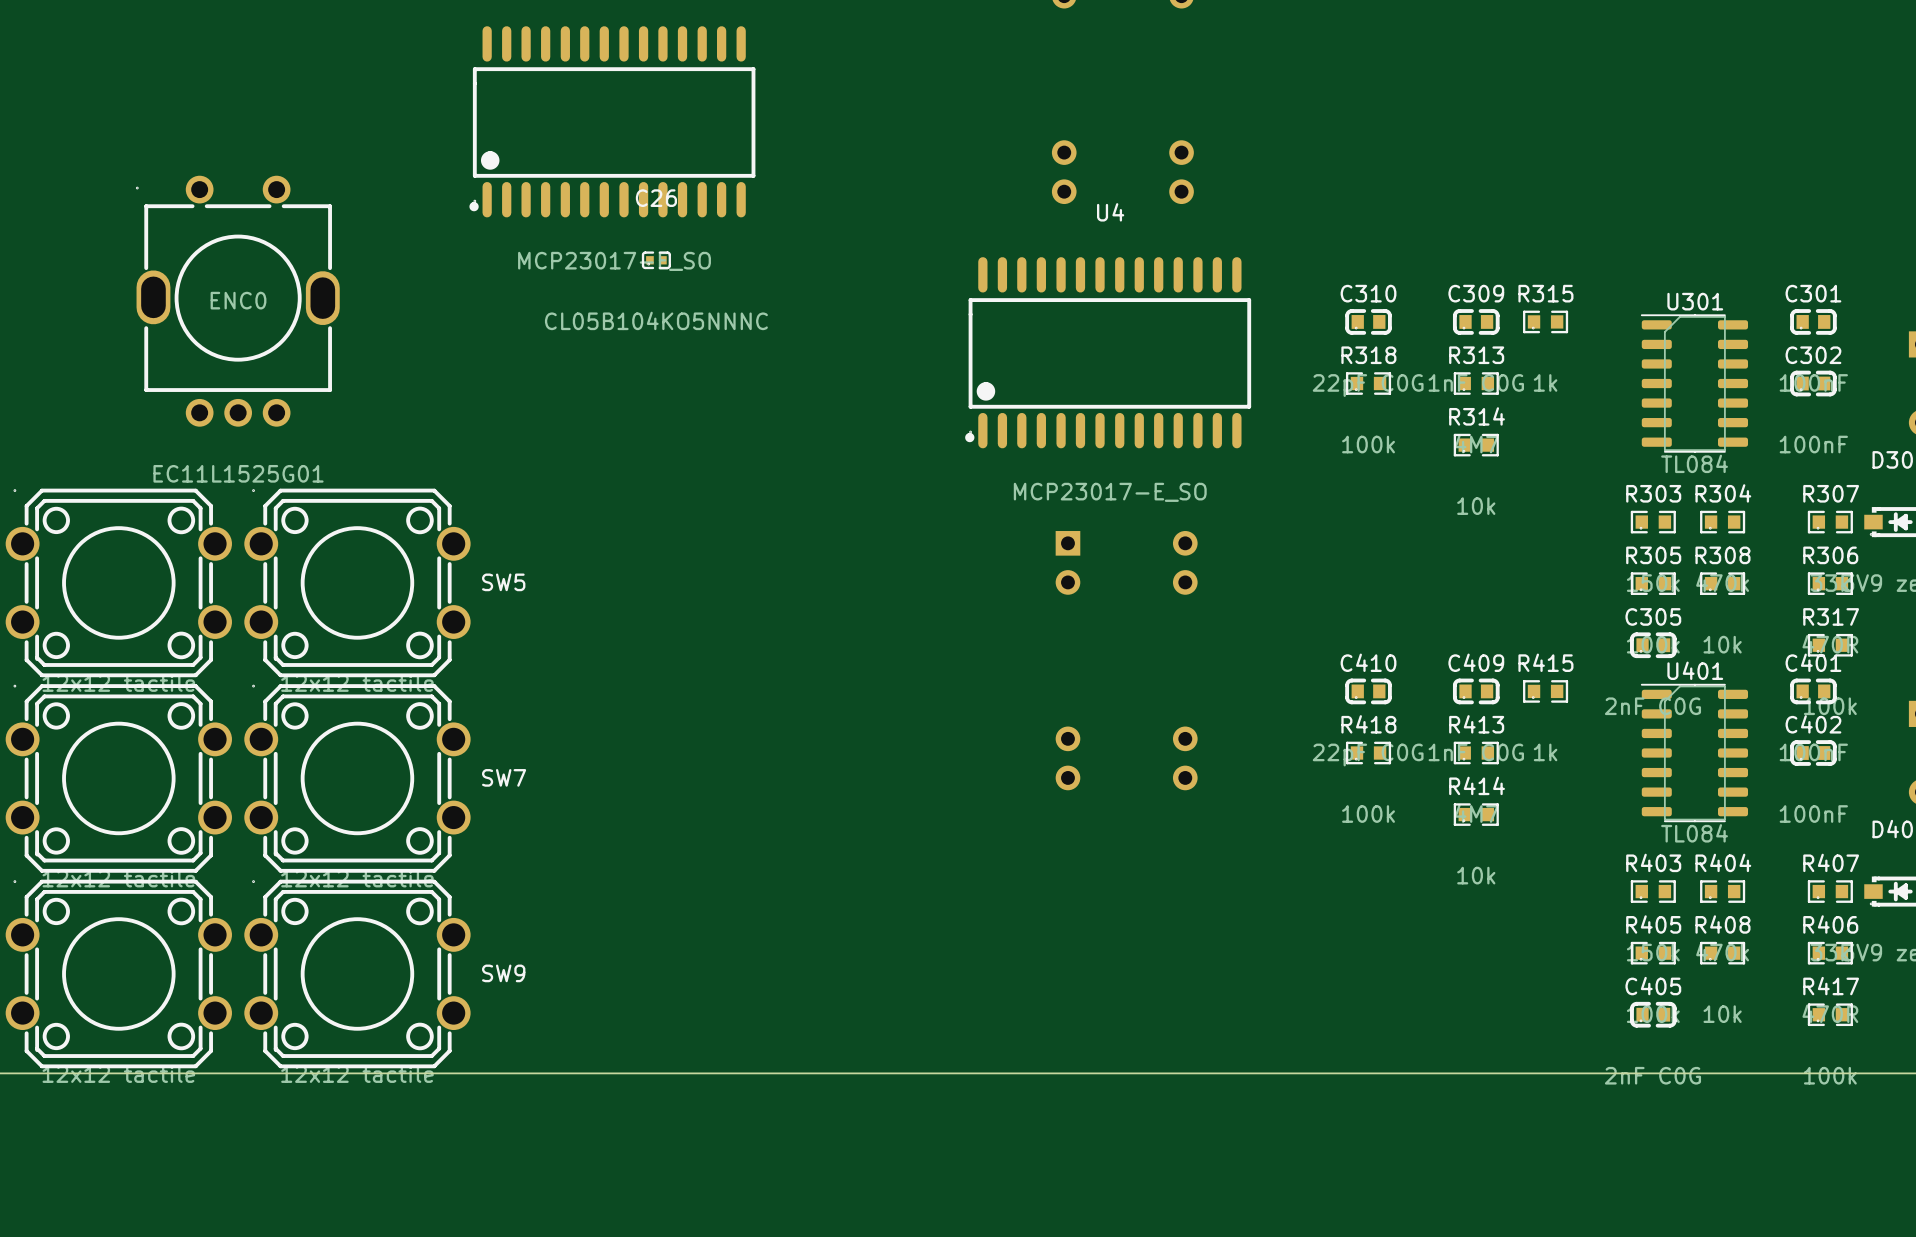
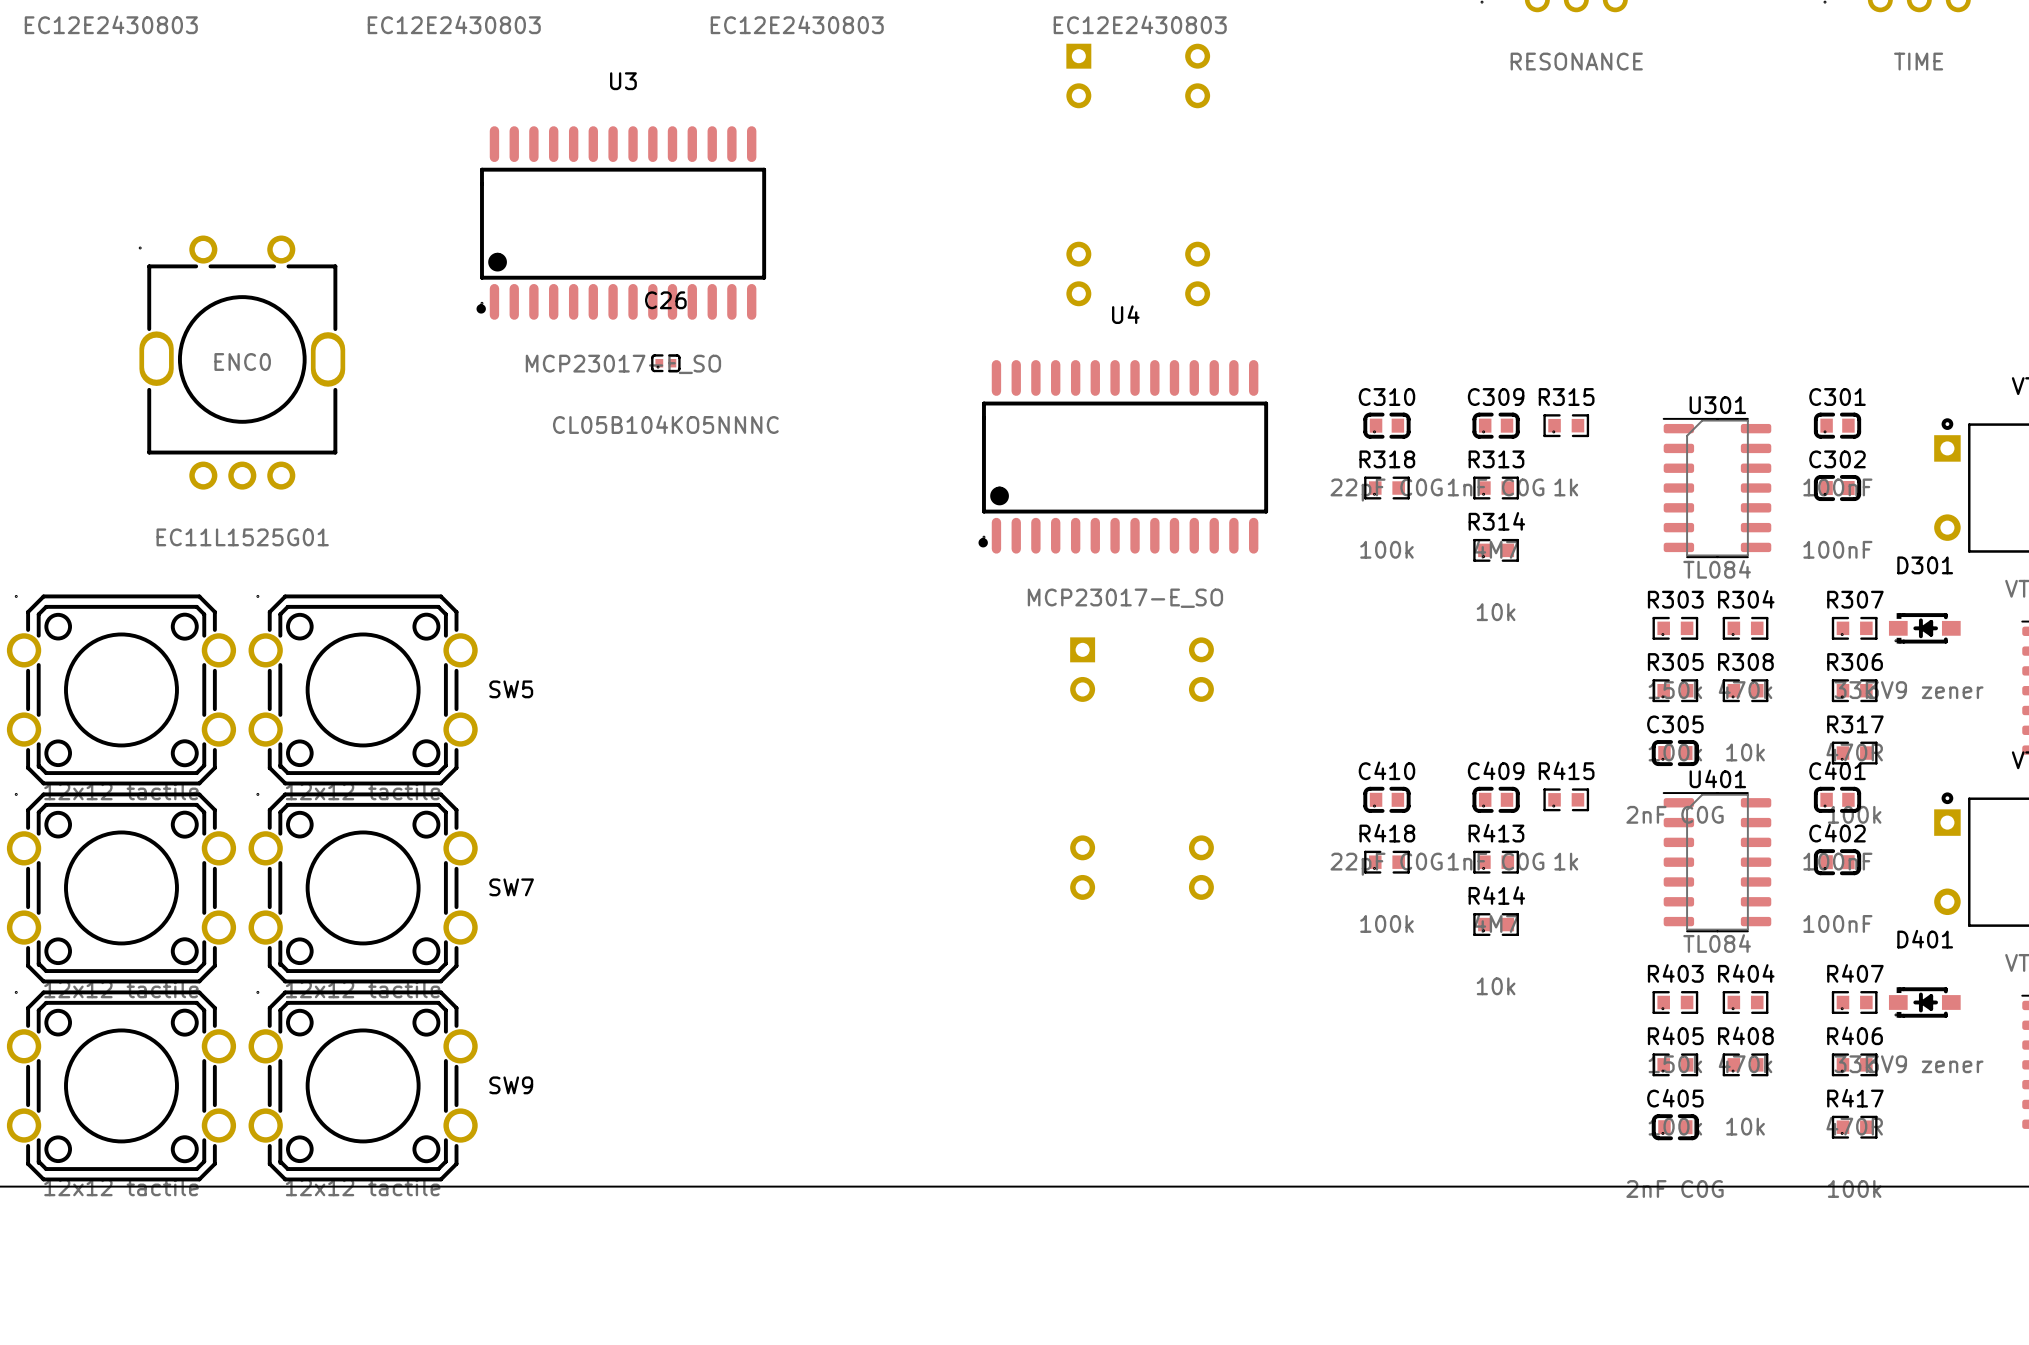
ENC0 position: (238, 301) -> (242, 362)

